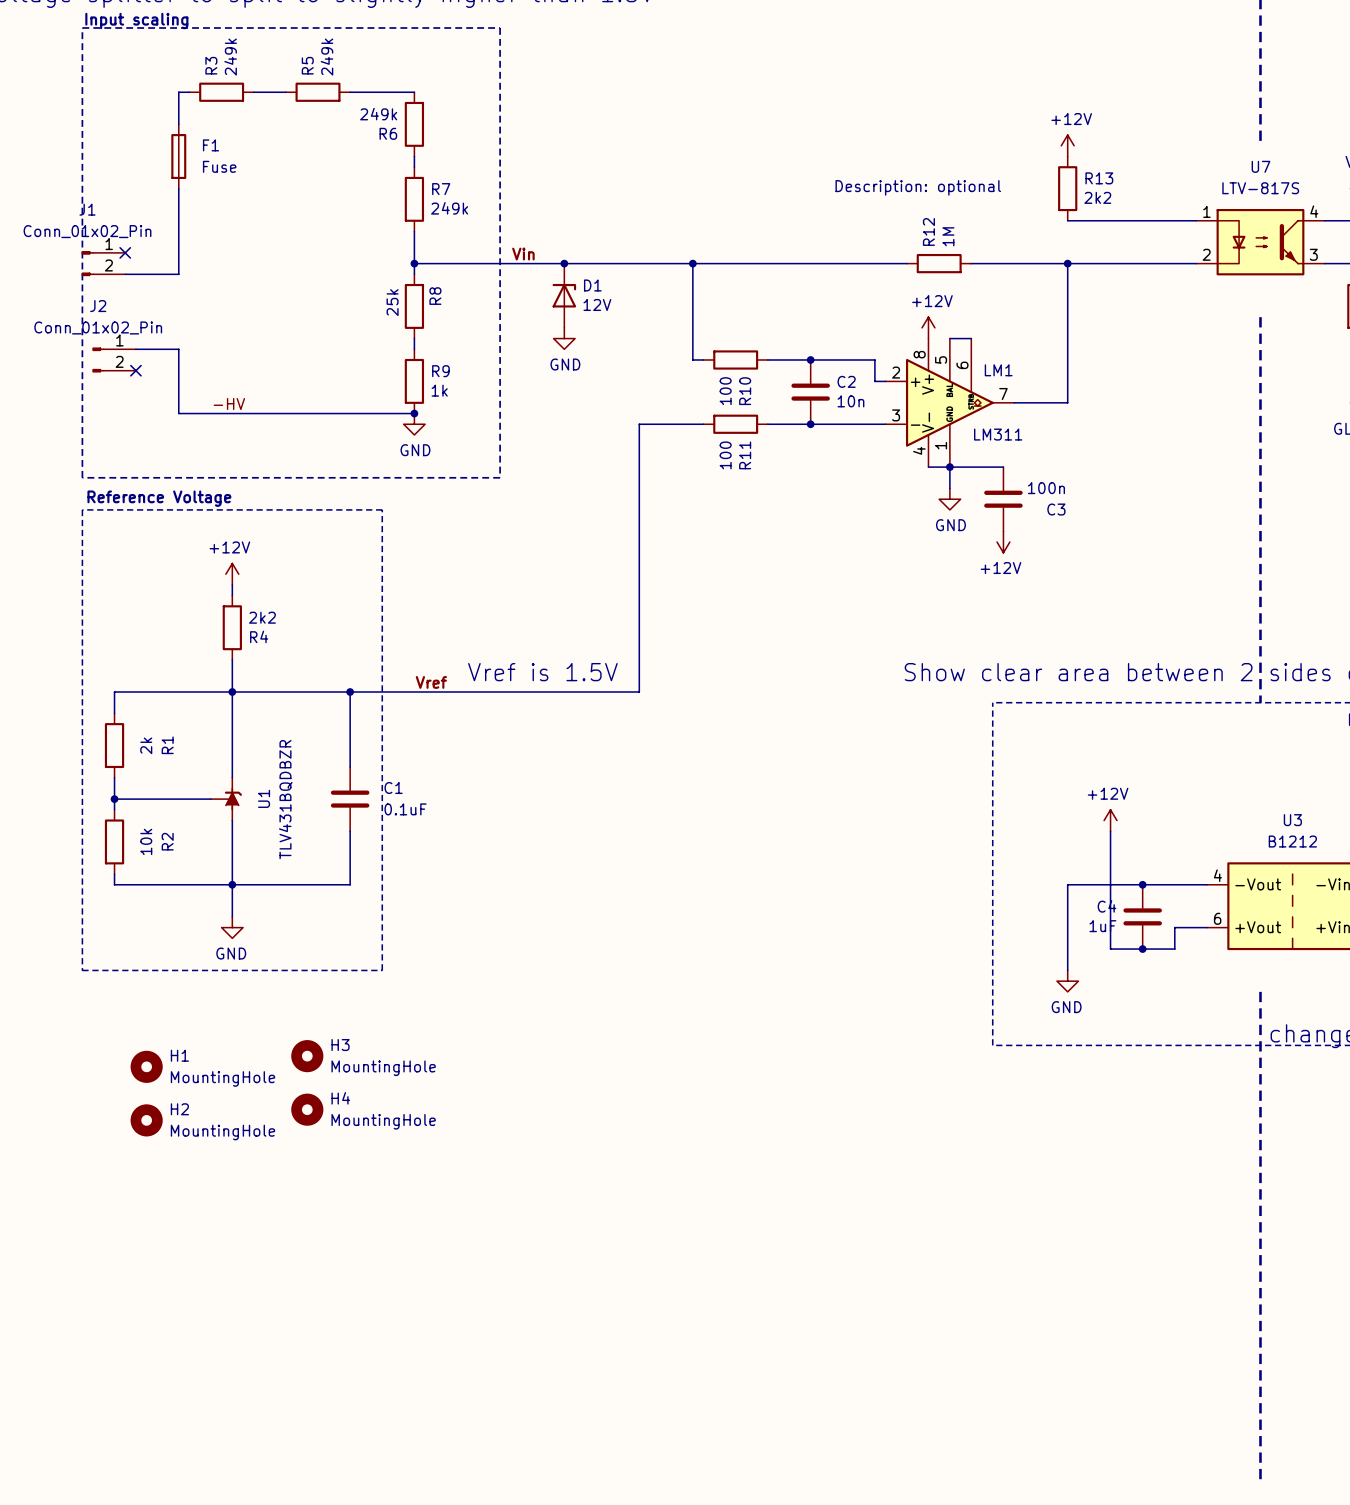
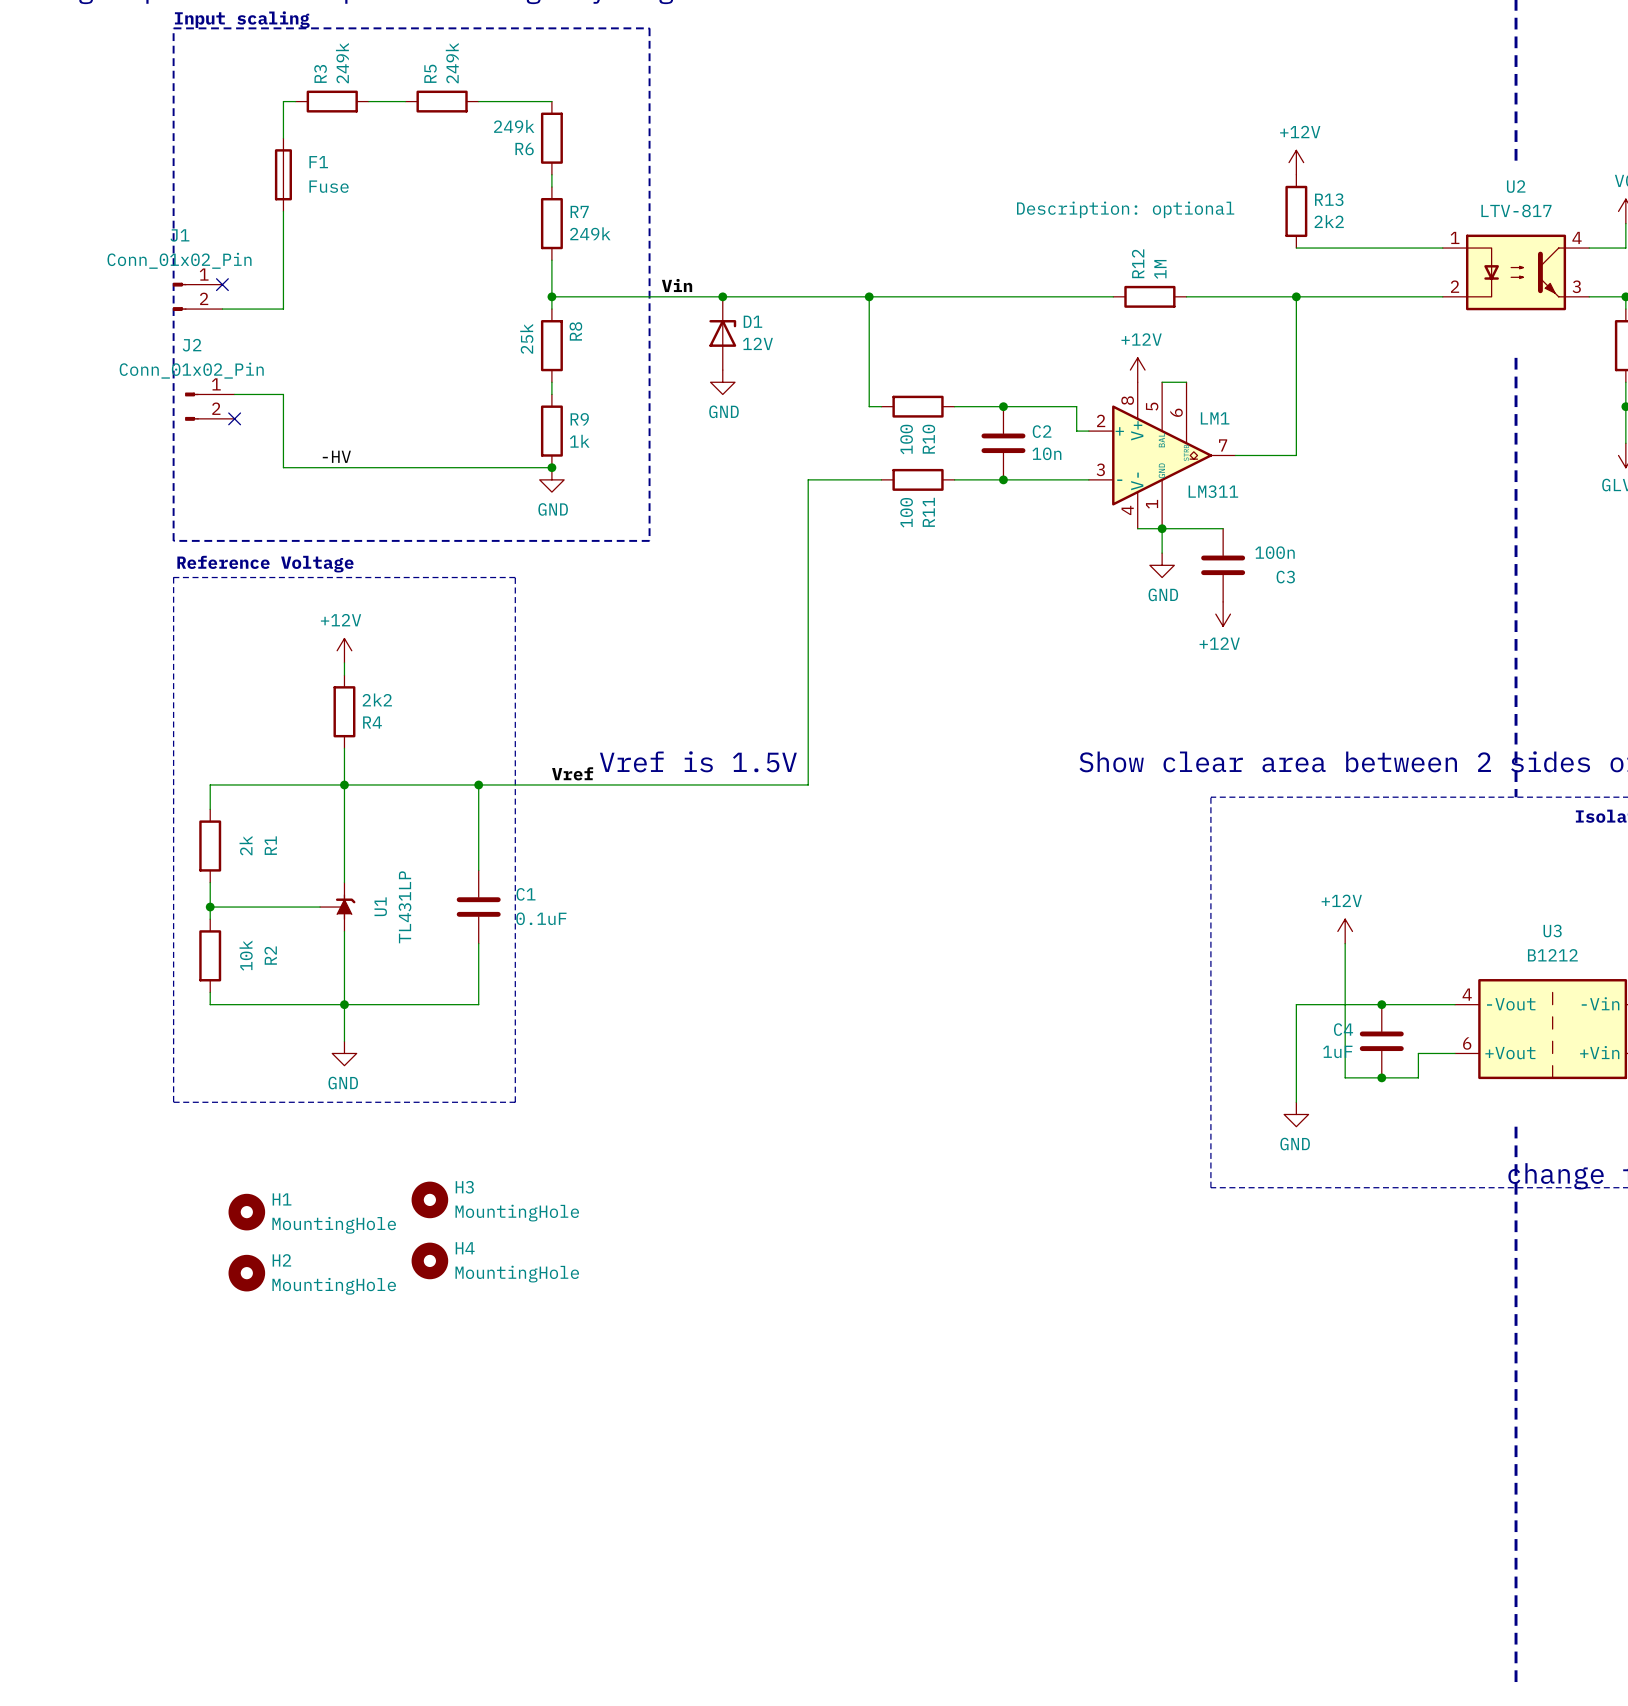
U7 name: U7 (1260, 166) -> U2 (1516, 186)
U7 value: LTV-817S (1260, 188) -> LTV-817 (1516, 210)
U1 value: TLV431BQDBZR (285, 799) -> TL431LP (405, 907)

